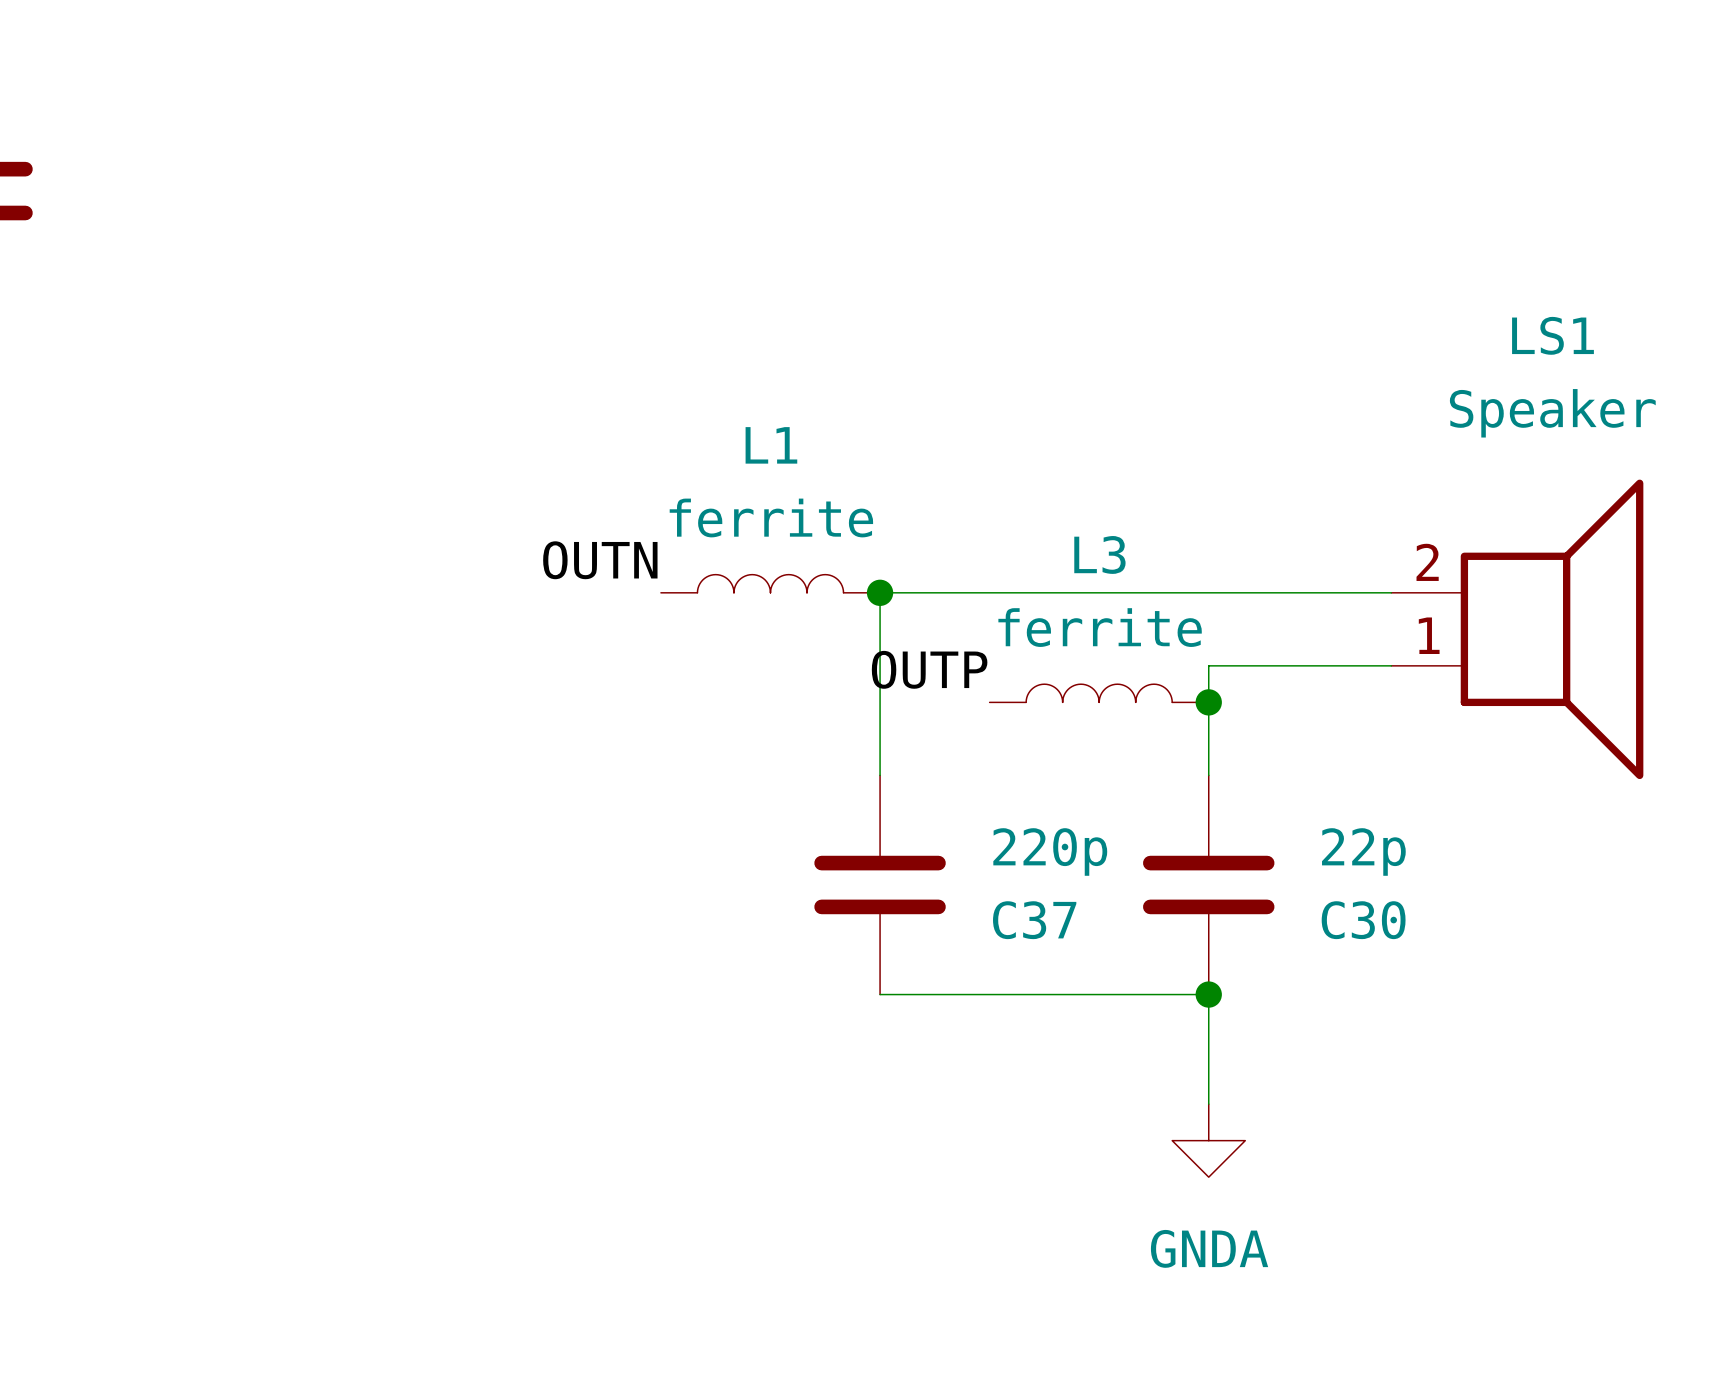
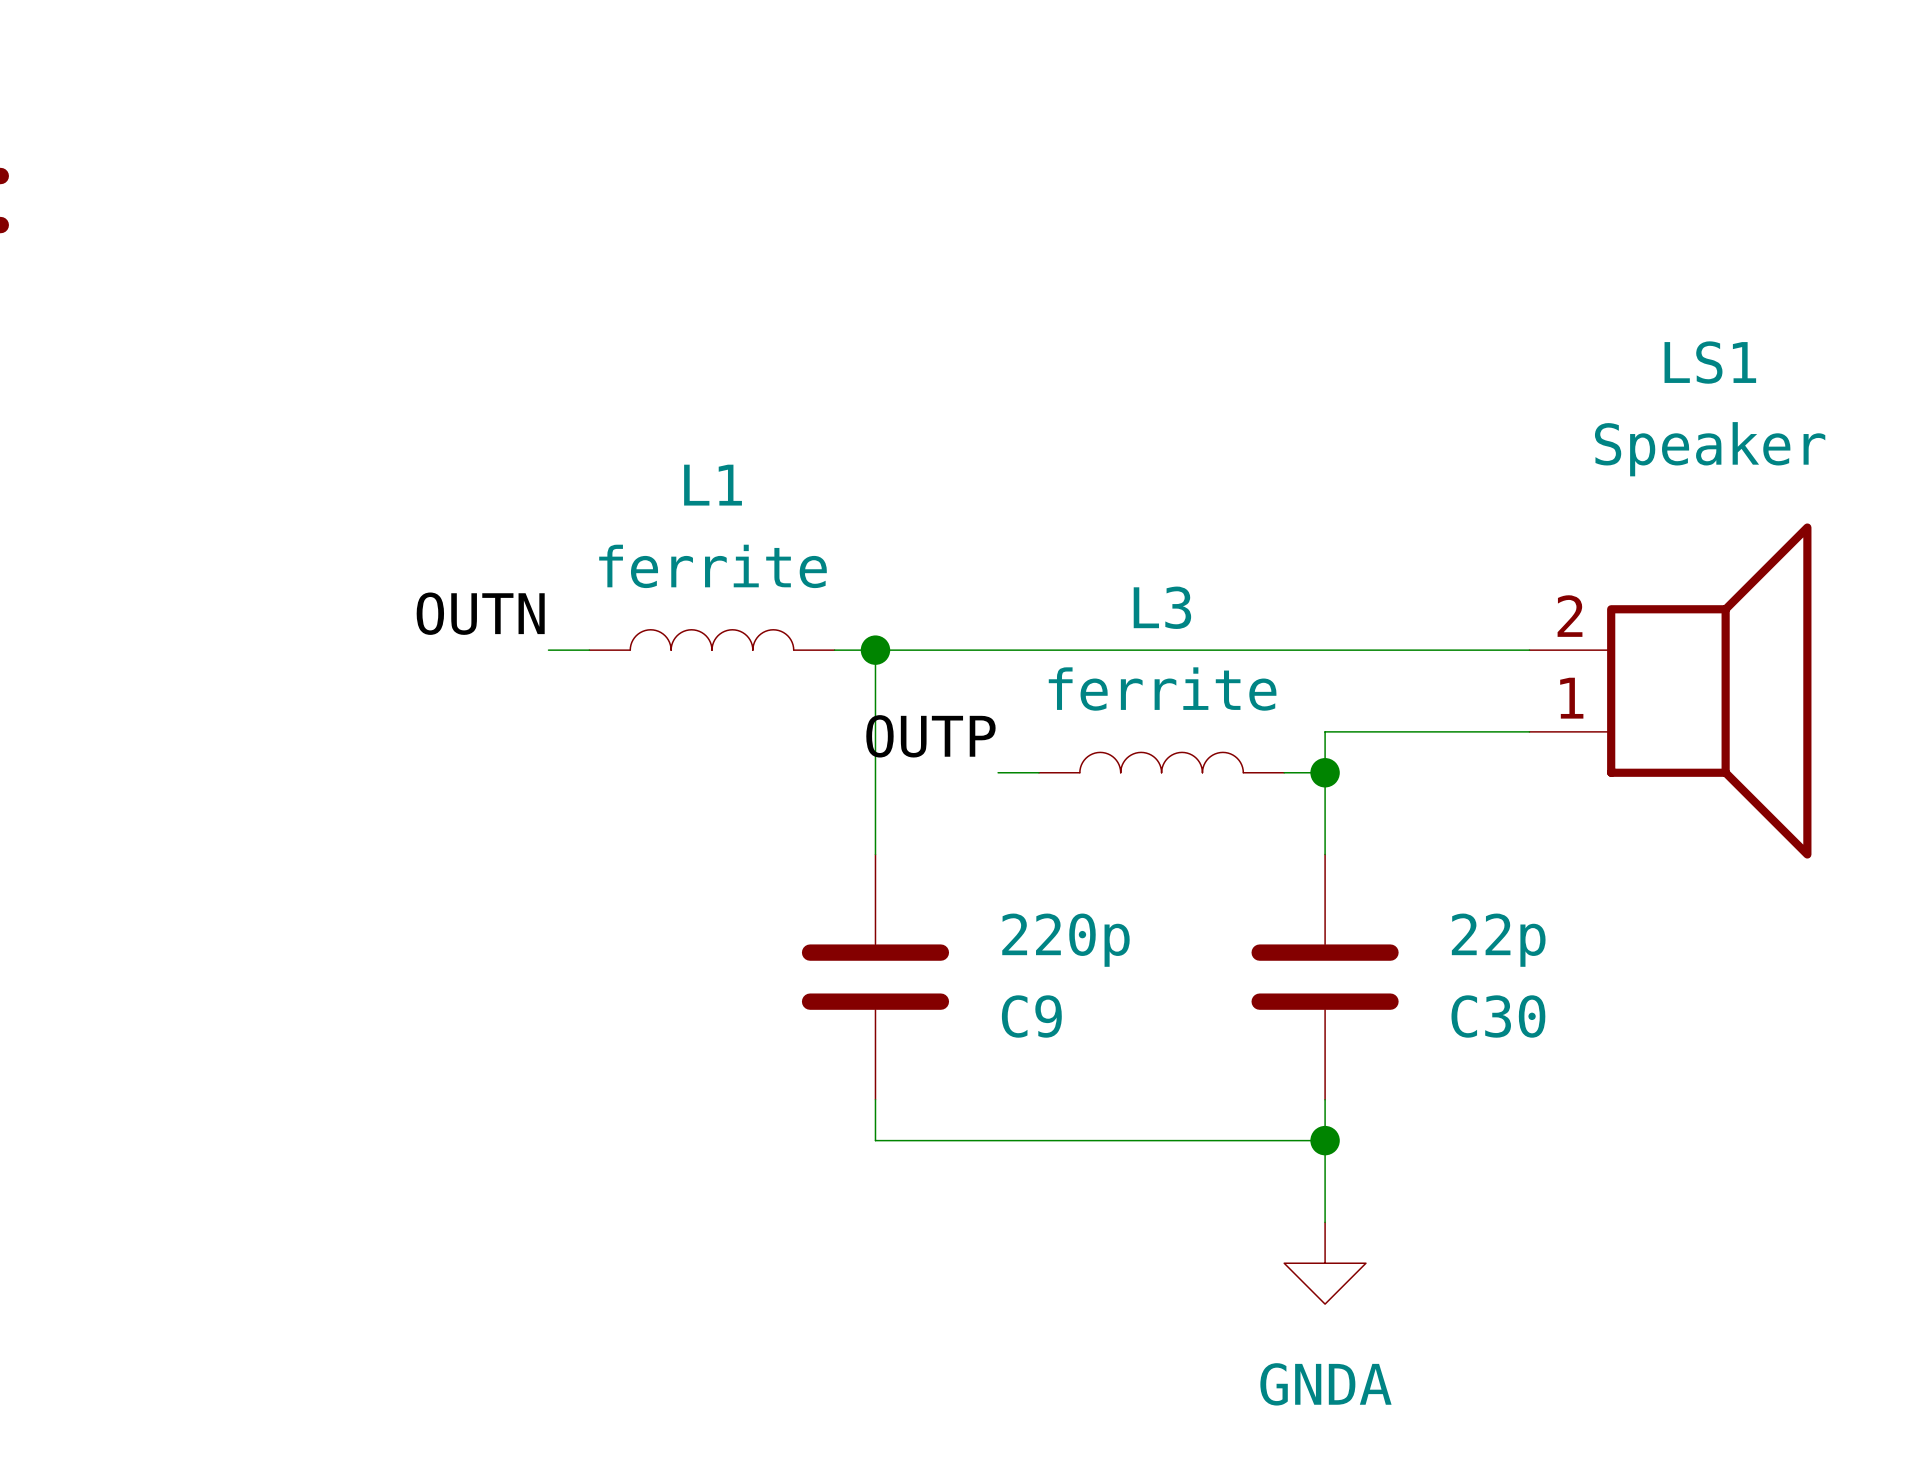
label position: OUTN (600, 560) -> OUTN (480, 613)
L1 position: (770, 583) -> (711, 639)
wire: none -> (548, 650) (589, 650)
wire: none -> (875, 650) (875, 854)
wire: (880, 592) (880, 775) -> (957, 650) (834, 650)
junction position: (880, 592) -> (875, 650)
label position: OUTP (929, 669) -> OUTP (930, 736)
L3 position: (1099, 693) -> (1161, 762)
wire: none -> (998, 772) (1038, 772)
C9: none -> 220p (875, 977)
C37: 220p (880, 884) -> none
wire: none -> (875, 1099) (875, 1140) (1325, 1140)
wire: (880, 994) (1208, 994) -> none
junction position: (1208, 994) -> (1325, 1140)

